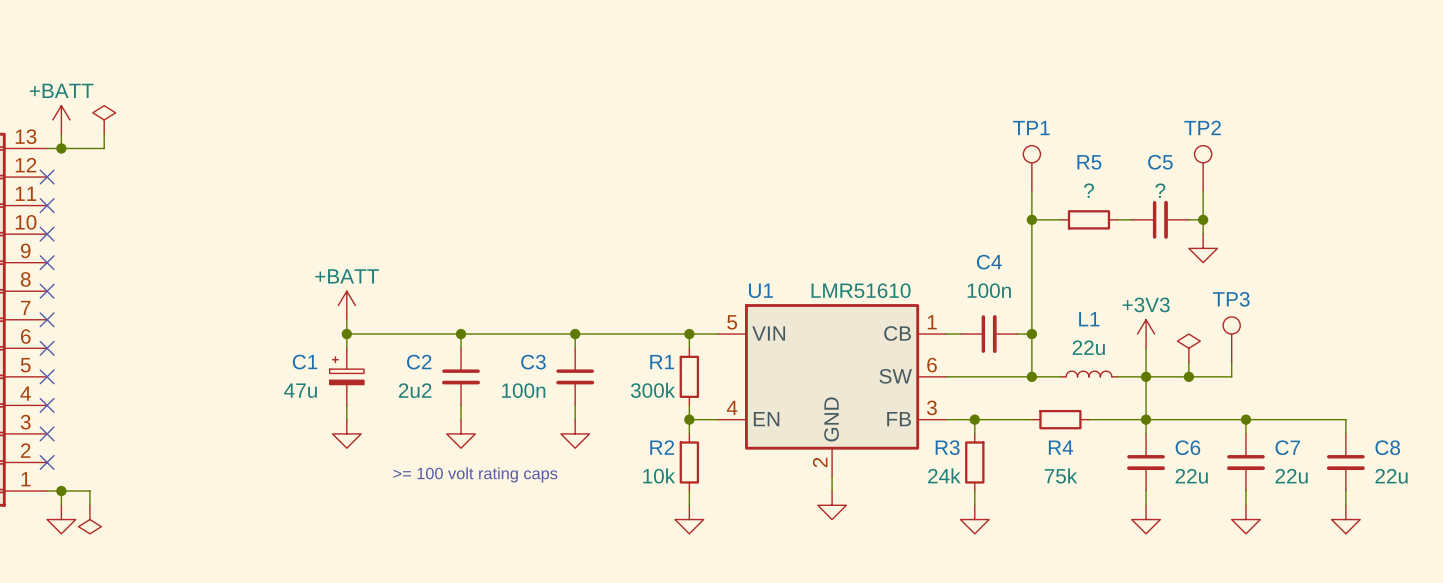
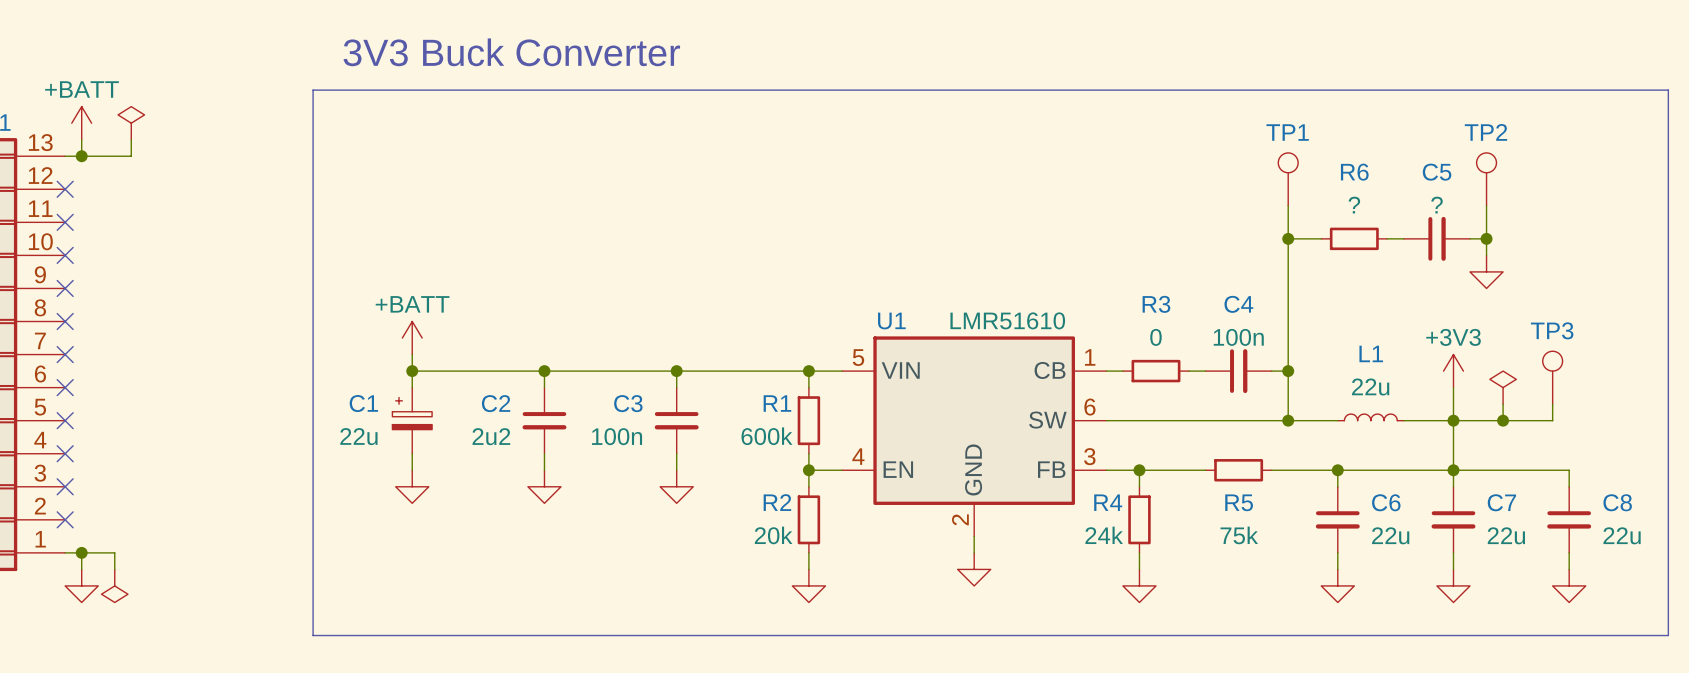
text: none -> 3V3 Buck Converter (511, 52)
line: none -> (313, 90) (1668, 90) (1668, 635) (313, 635) (313, 90)
TP1 position: (1031, 168) -> (1288, 179)
TP2 position: (1203, 168) -> (1486, 179)
wire: (1031, 191) (1031, 376) -> (1288, 205) (1288, 420)
wire: (1203, 191) (1203, 234) -> (1486, 205) (1486, 255)
wire: (1031, 219) (1060, 219) -> none
junction: (1031, 219) -> none
R5: ? (1088, 219) -> none
junction: none -> (1288, 238)
C5 position: (1160, 219) -> (1436, 238)
R6: none -> ? (1354, 238)
junction: (1203, 219) -> none
wire: none -> (1470, 238) (1486, 238)
junction: none -> (1486, 238)
power symbol position: (1203, 248) -> (1486, 271)
C4 name position: C4 (989, 262) -> C4 (1238, 304)
C4 value position: 100n (989, 290) -> 100n (1238, 337)
C4 position: (989, 334) -> (1238, 371)
R3: none -> 0 (1155, 371)
junction: (1031, 334) -> none
wire: none -> (1271, 371) (1288, 371)
junction: none -> (1288, 371)
power symbol position: +3V3 (1146, 334) -> +3V3 (1453, 371)
TP3 position: (1231, 339) -> (1552, 377)
wire: (1146, 348) (1146, 419) -> (1453, 387) (1453, 470)
power symbol position: (1188, 348) -> (1503, 387)
wire: (1188, 362) (1188, 376) -> (1503, 404) (1503, 420)
wire: (1231, 362) (1231, 376) -> (1552, 404) (1552, 420) (1436, 420)
L1 position: (1088, 374) -> (1370, 417)
junction: (1031, 376) -> none
junction: none -> (1288, 420)
wire: (1146, 376) (1203, 376) -> (1238, 420) (1304, 420)
junction: (1146, 376) -> none
junction: (1188, 376) -> none
junction: none -> (1453, 420)
junction: none -> (1503, 420)
C1 value: 47u (300, 390) -> 22u (358, 436)
R1 value: 300k (653, 390) -> 600k (766, 436)
R3 name: R3 (947, 447) -> R4 (1108, 502)
R4 name: R4 (1060, 447) -> R5 (1239, 502)
text: >= 100 volt rating caps (475, 474) -> none
R2 value: 10k (659, 475) -> 20k (773, 535)

